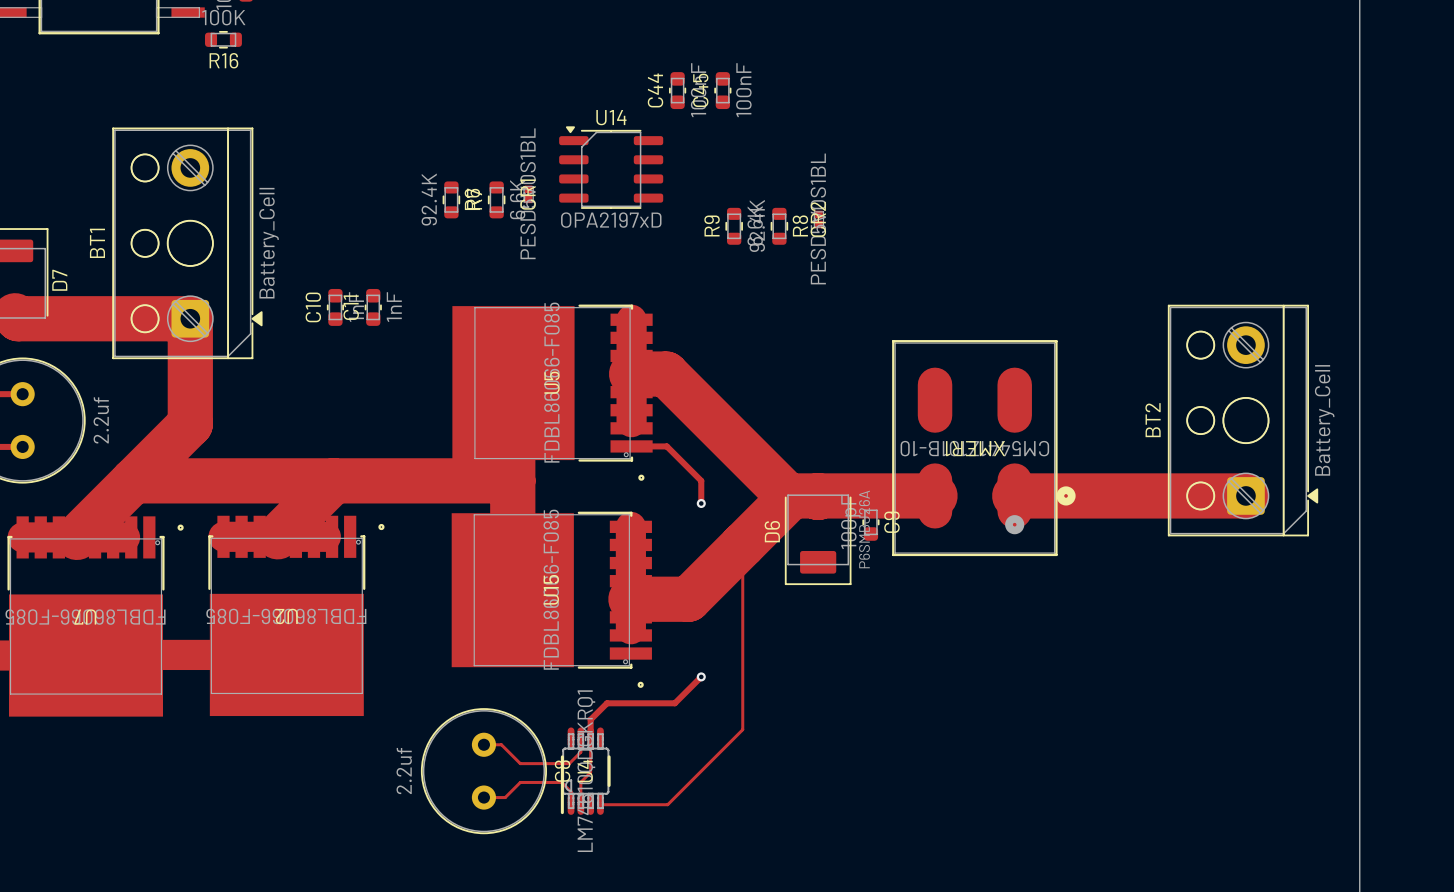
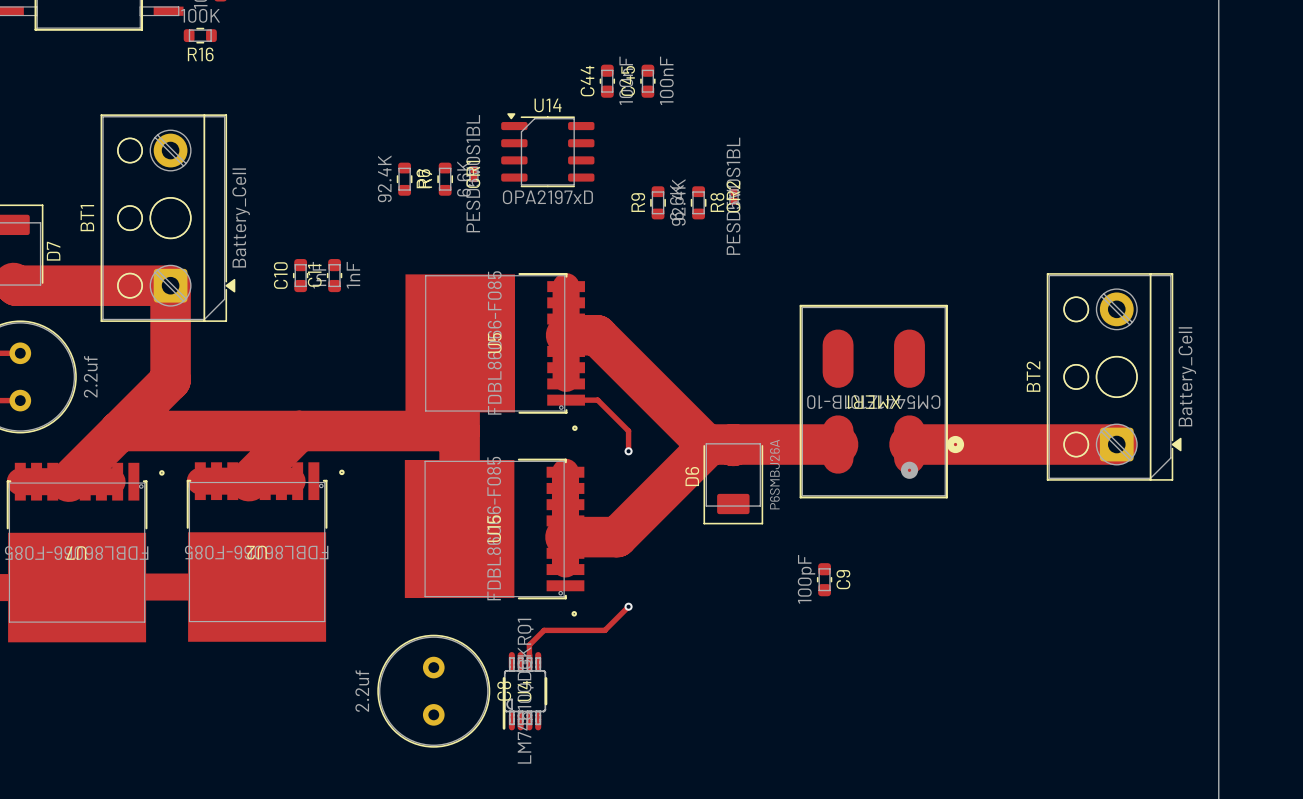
C9 position: (870, 522) -> (824, 579)
track: (742, 544) (742, 729) (667, 804) (600, 804) -> none
track: (580, 737) (580, 752) (569, 763) (520, 763) (501, 744) (483, 744) -> none
track: (590, 737) (590, 772) (580, 782) (580, 804) -> none
track: (483, 797) (505, 797) (520, 782) (561, 782) (571, 791) (571, 804) -> none

